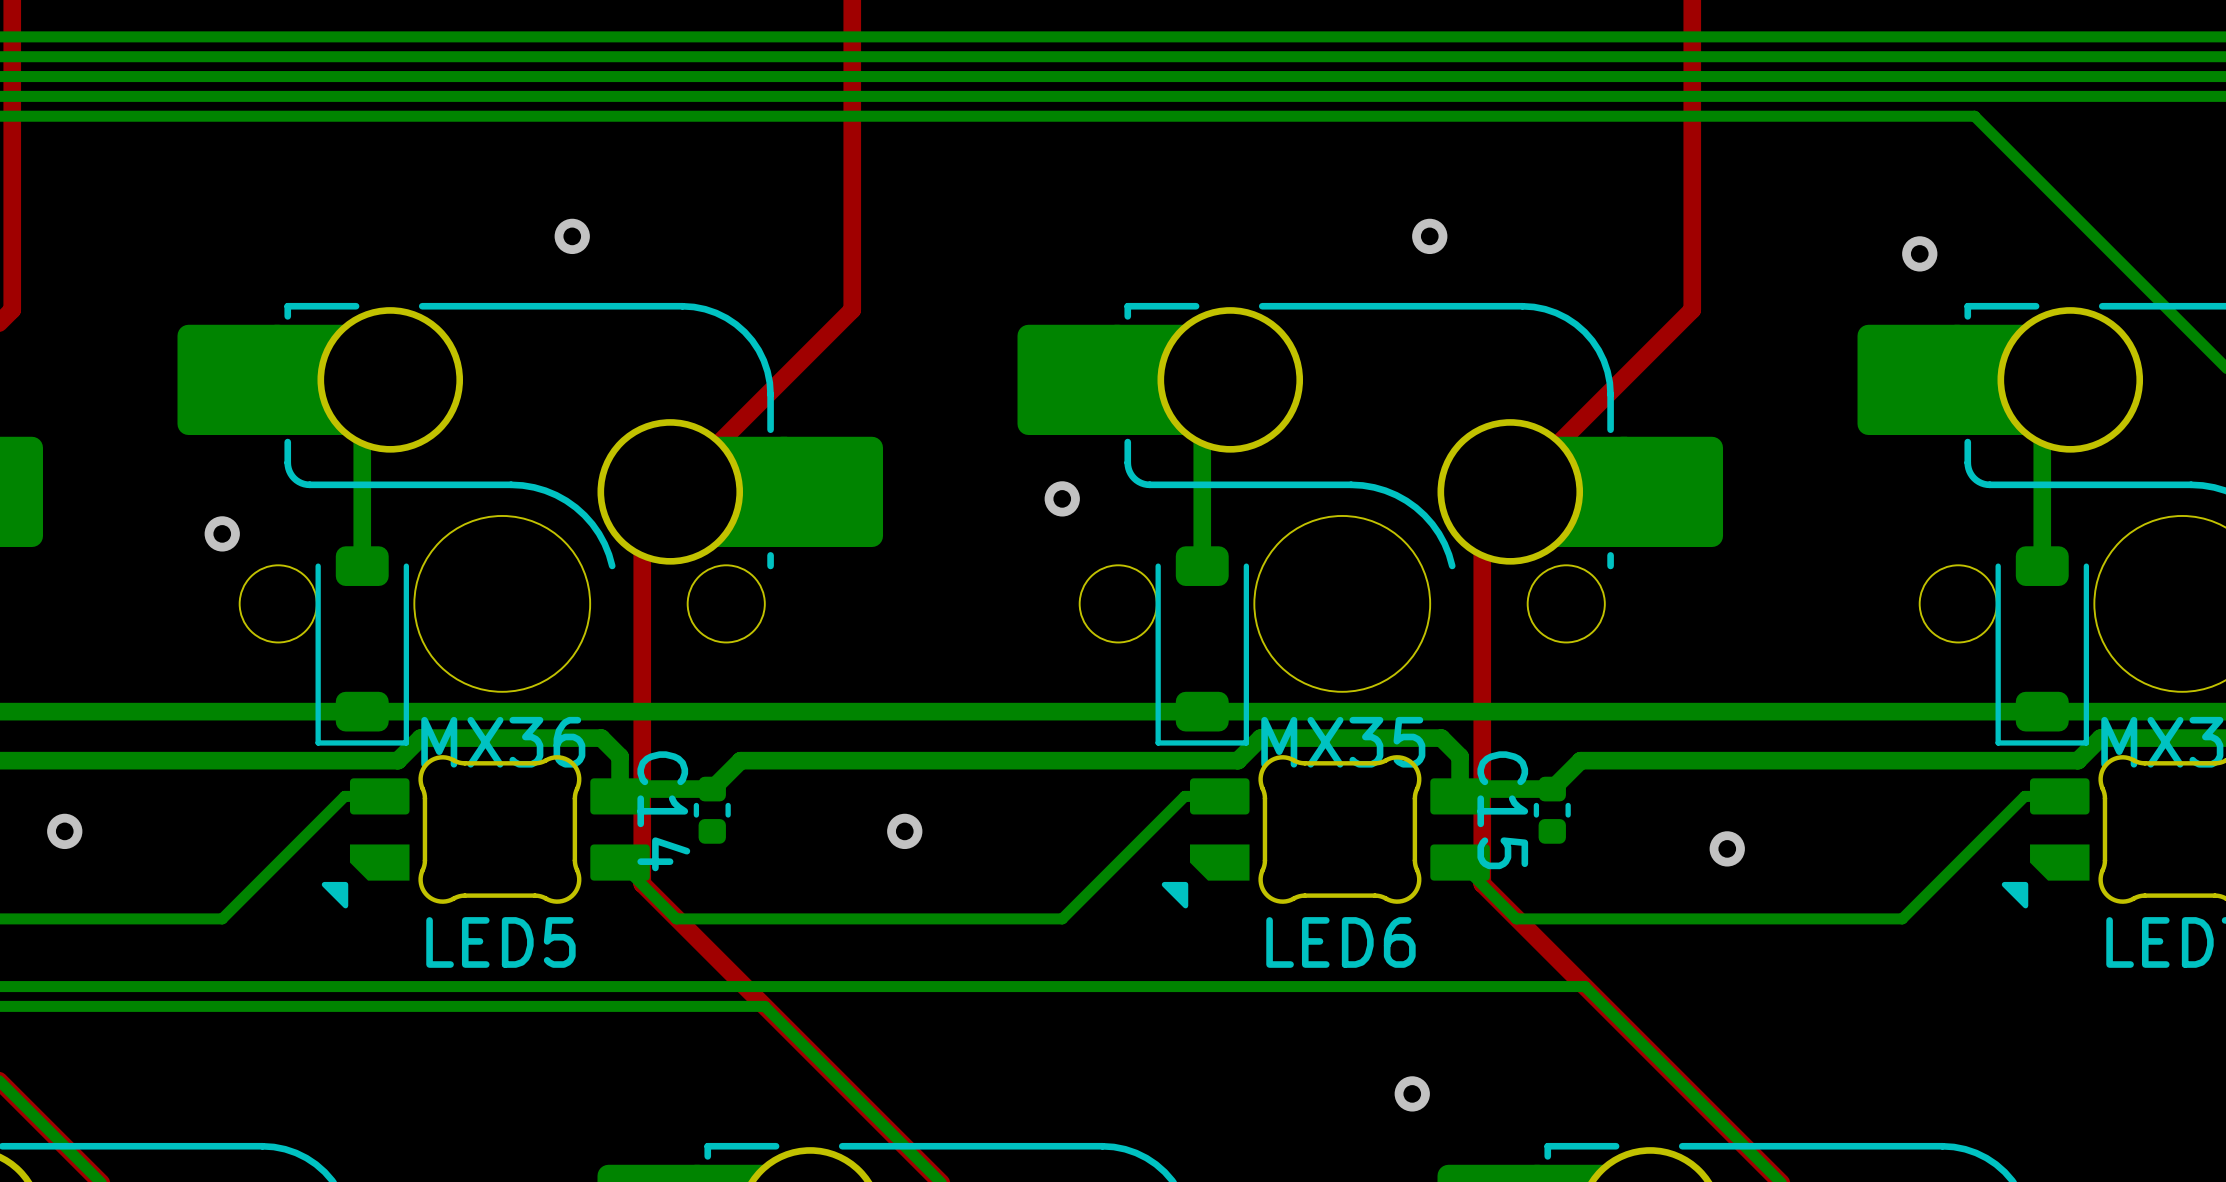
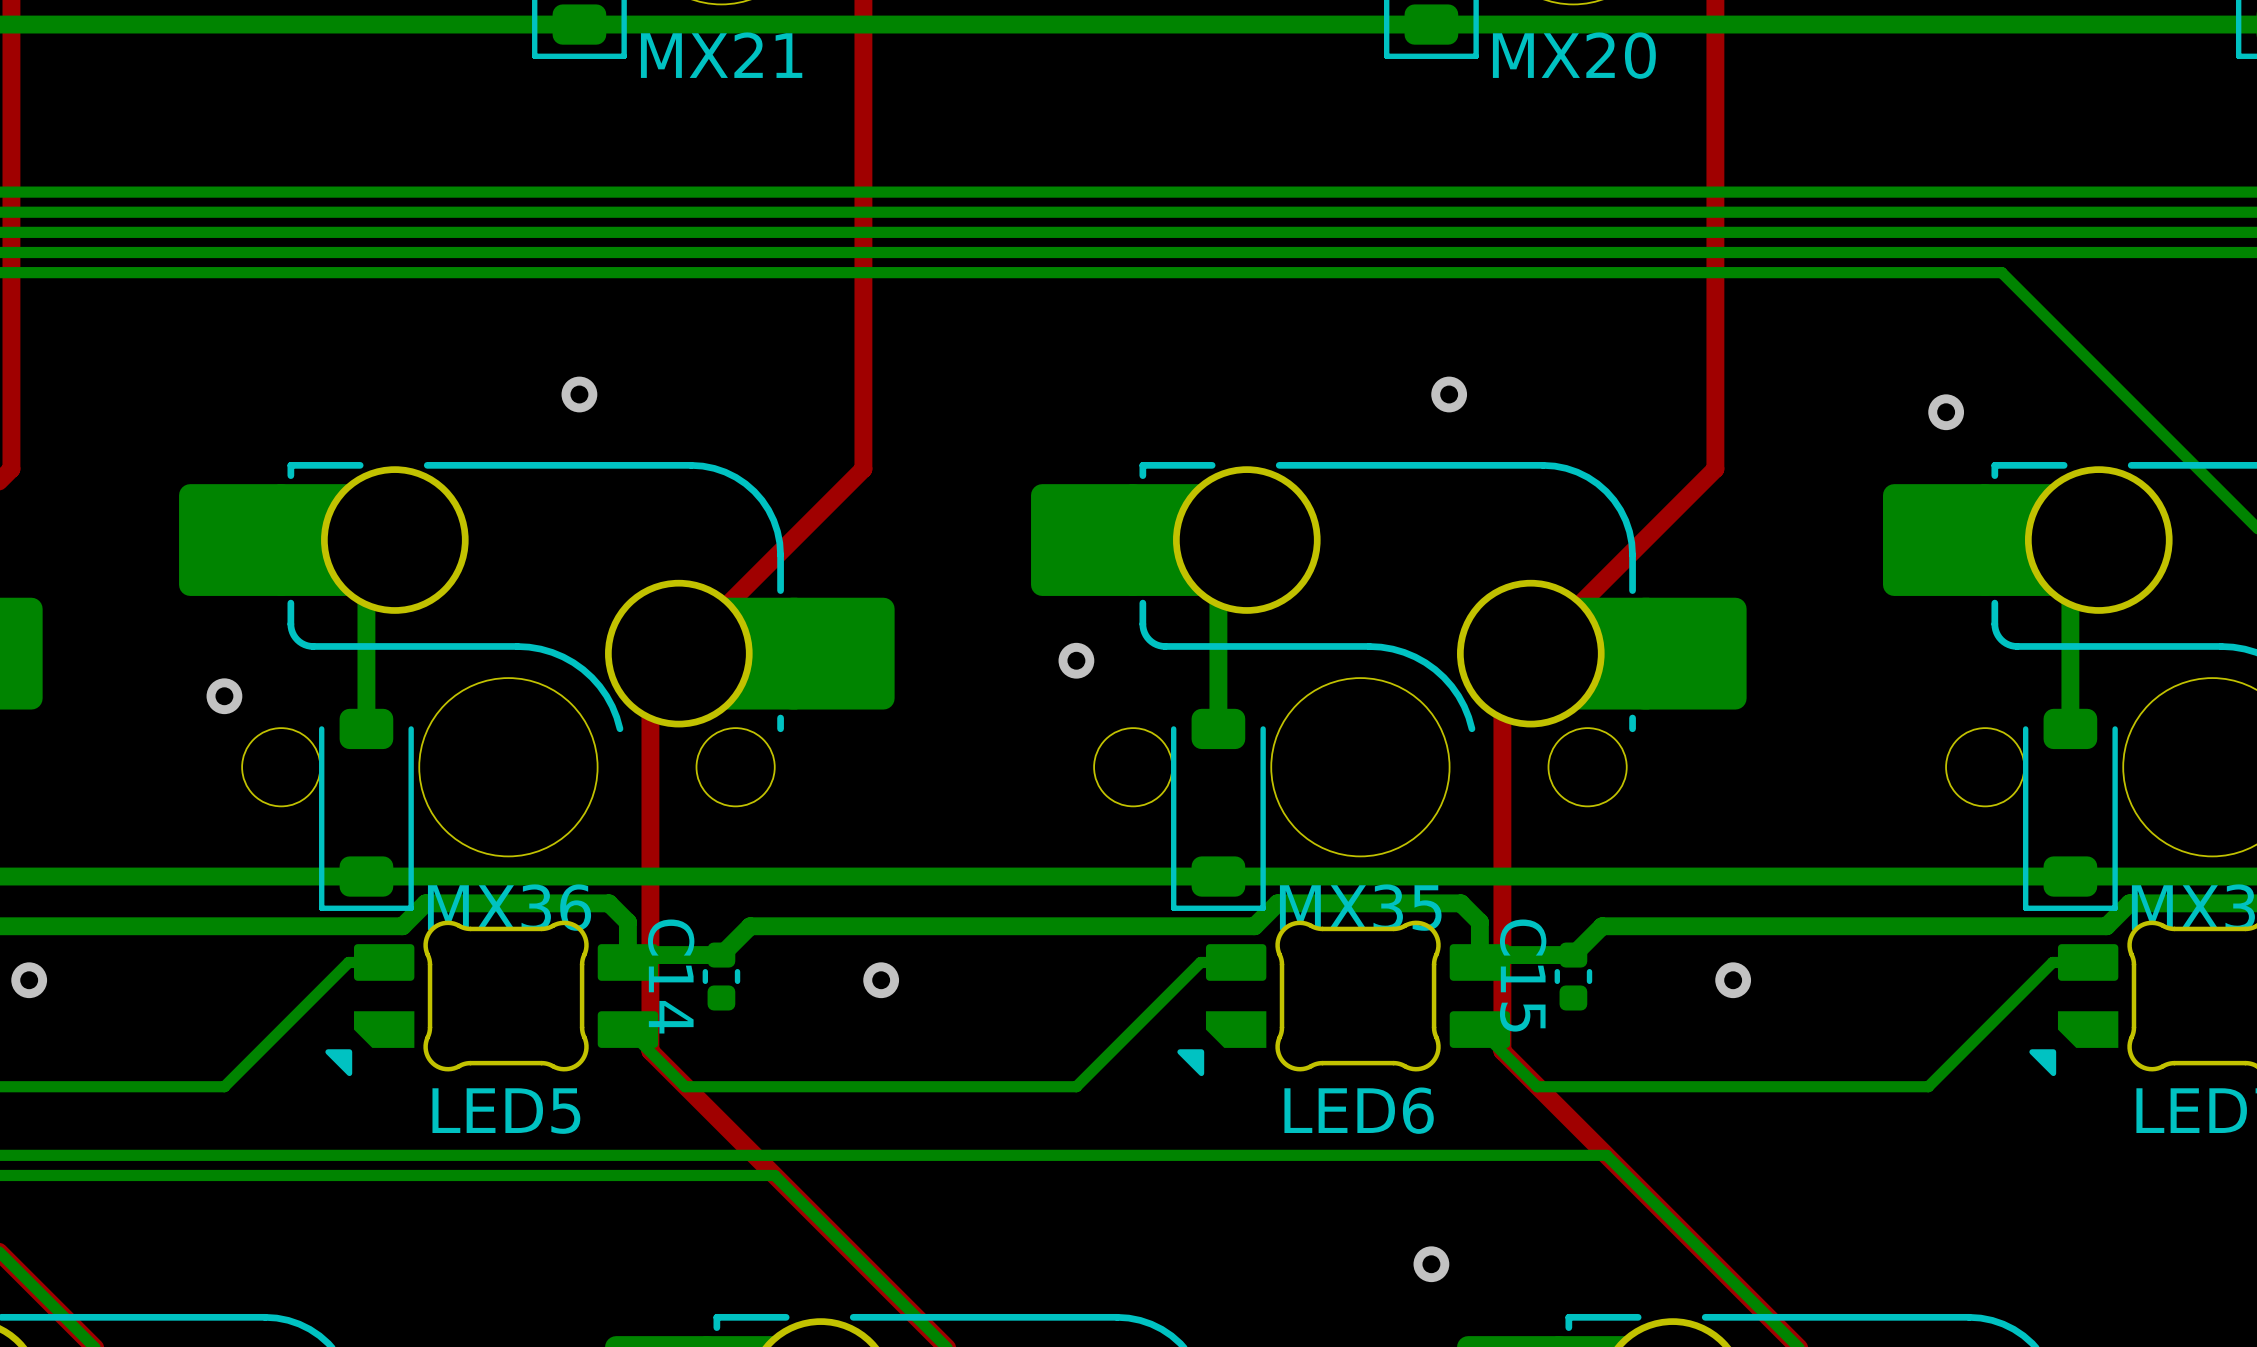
via position: (64, 831) -> (29, 980)
via position: (904, 831) -> (881, 980)
via position: (1727, 848) -> (1733, 980)

